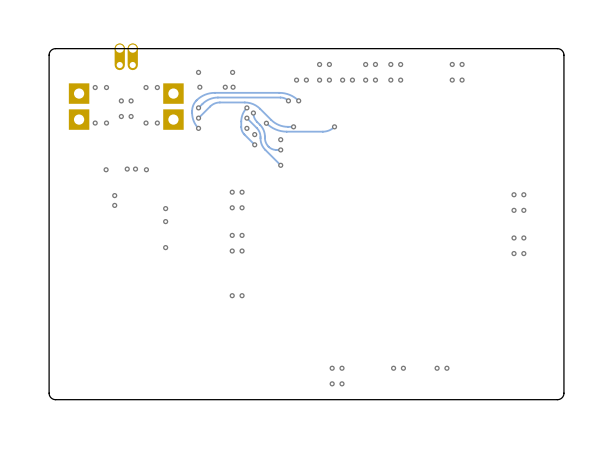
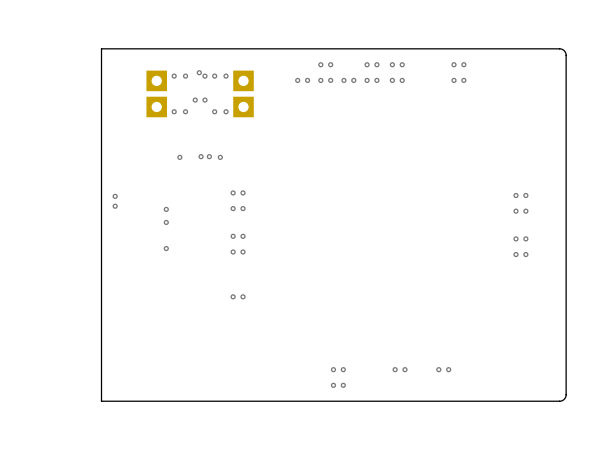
board edge: (101, 48) (54, 48) (51, 50) (49, 55) (49, 393) (54, 399) (101, 399) -> (101, 48) (101, 401)
part: (119, 56) -> none
part: (132, 56) -> none
via: (232, 72) -> none
via: none -> (174, 76)
via: none -> (185, 76)
via: none -> (204, 76)
via: none -> (214, 76)
via: none -> (226, 76)
part: none -> (156, 80)
part: none -> (243, 80)
via: (95, 87) -> none
via: (106, 87) -> none
via: (146, 87) -> none
via: (157, 87) -> none
via: (199, 87) -> none
via: (225, 87) -> none
via: (233, 87) -> none
part: (79, 93) -> none
part: (173, 93) -> none
via: none -> (195, 100)
via: none -> (204, 100)
via: (121, 100) -> none
via: (131, 100) -> none
track: (288, 100) (280, 97) (215, 97) (207, 100) (198, 107) -> none
via: (288, 100) -> none
track: (298, 100) (289, 94) (282, 92) (207, 93) (198, 98) (192, 107) (193, 119) (198, 128) -> none
via: (298, 100) -> none
part: none -> (156, 106)
part: none -> (243, 106)
via: (198, 107) -> none
track: (246, 107) (242, 115) (241, 129) (254, 144) -> none
via: (246, 107) -> none
via: none -> (174, 111)
via: none -> (185, 111)
via: none -> (214, 111)
via: none -> (226, 111)
track: (253, 113) (254, 118) (263, 130) (267, 145) (273, 149) (280, 149) -> none
via: (253, 113) -> none
via: (121, 116) -> none
via: (131, 116) -> none
track: (198, 118) (216, 102) (247, 102) (257, 106) (276, 124) (293, 126) -> none
via: (198, 118) -> none
track: (246, 118) (258, 130) (263, 148) (280, 165) -> none
via: (246, 118) -> none
part: (79, 119) -> none
part: (173, 119) -> none
via: (95, 123) -> none
via: (106, 123) -> none
via: (146, 123) -> none
via: (157, 123) -> none
track: (266, 123) (275, 129) (283, 131) (324, 131) (334, 126) -> none
via: (266, 123) -> none
via: (293, 126) -> none
via: (334, 126) -> none
via: (198, 128) -> none
via: (246, 128) -> none
via: (254, 134) -> none
via: (280, 139) -> none
via: (254, 144) -> none
via: (280, 149) -> none
via: none -> (179, 157)
via: none -> (201, 156)
via: none -> (209, 156)
via: none -> (220, 157)
via: (280, 165) -> none
via: (106, 169) -> none
via: (127, 169) -> none
via: (135, 169) -> none
via: (146, 169) -> none

